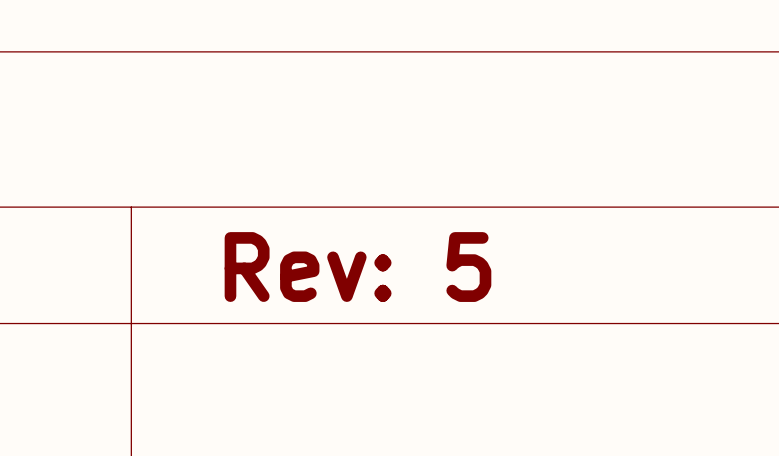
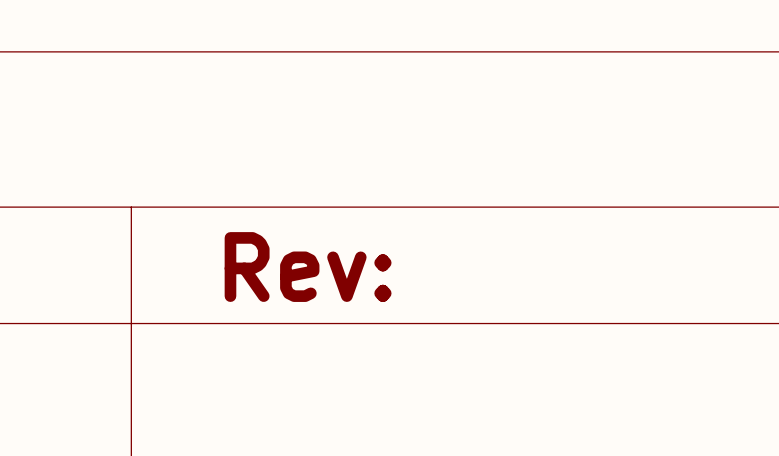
title block: Rev: 5 (357, 267) -> Rev: (308, 267)

